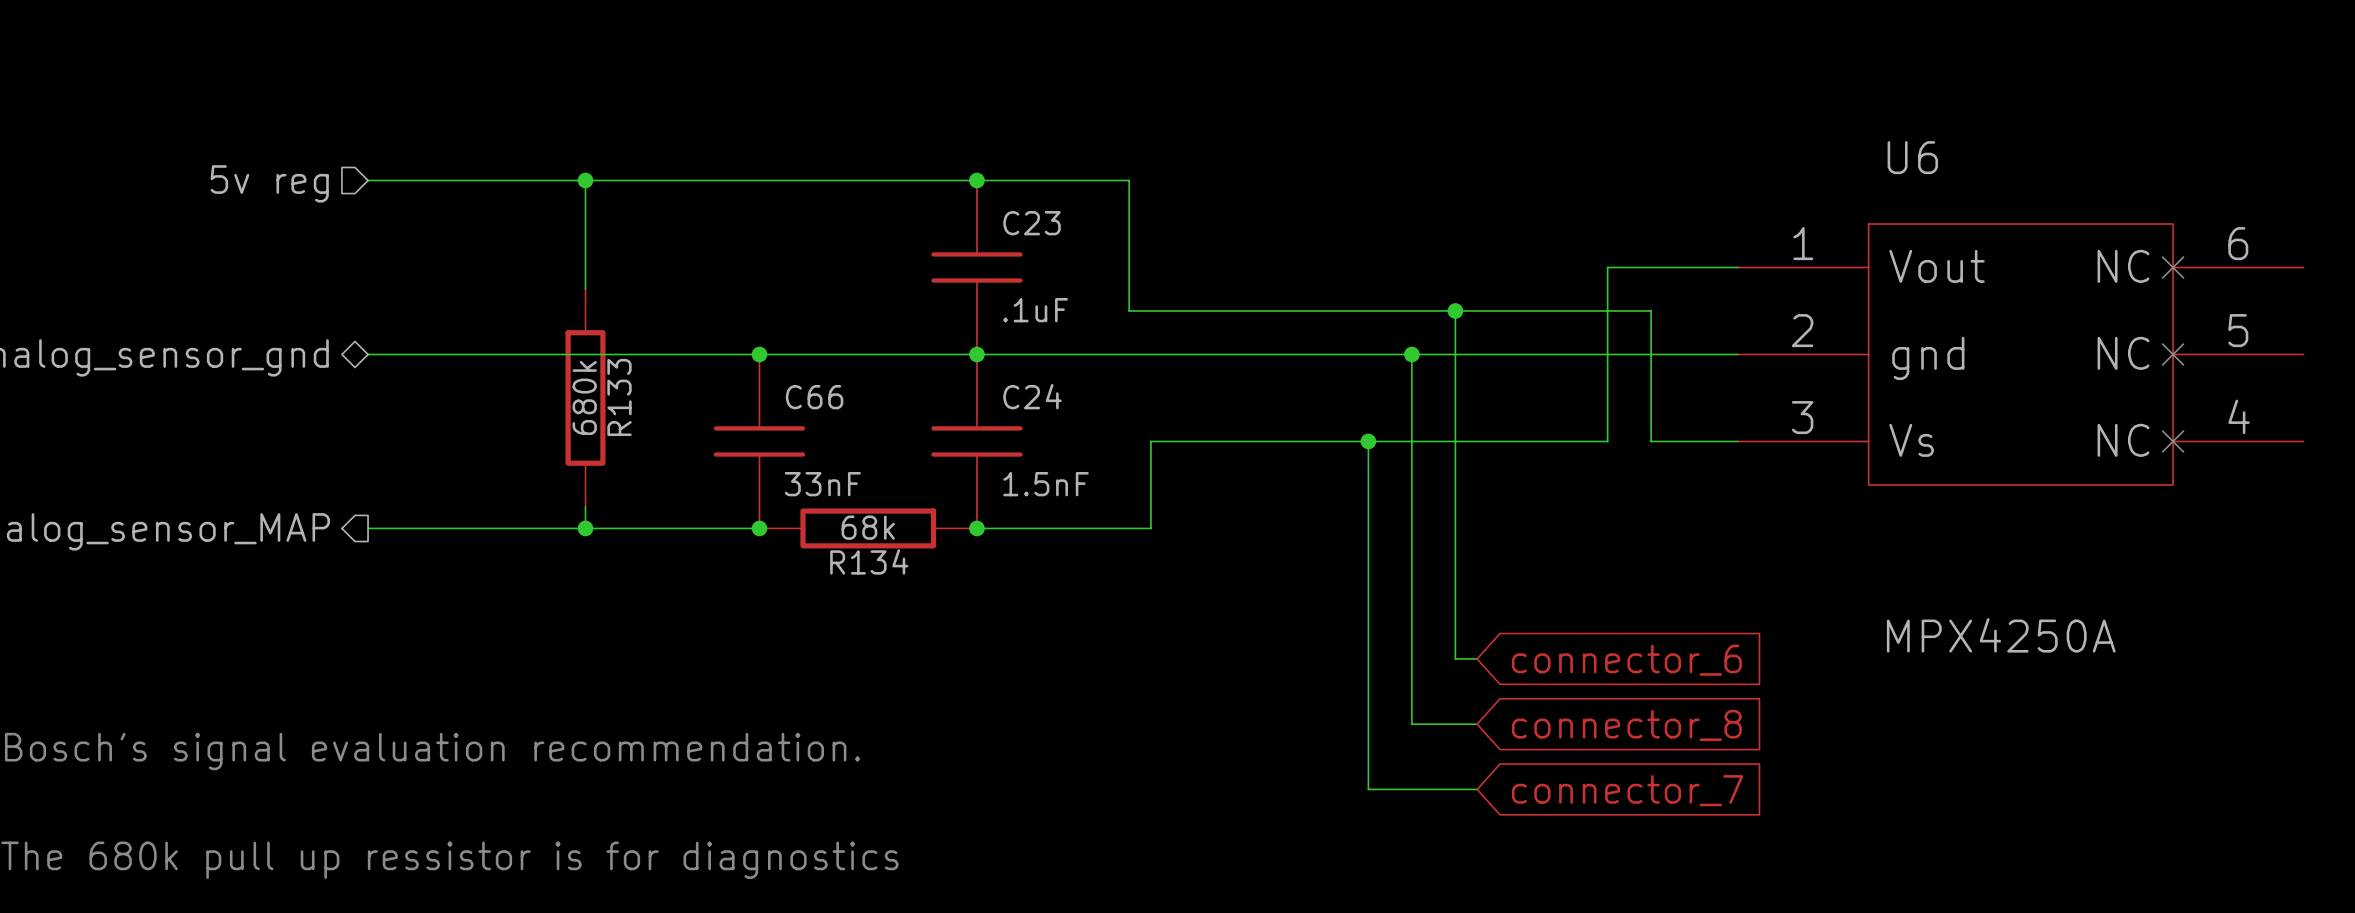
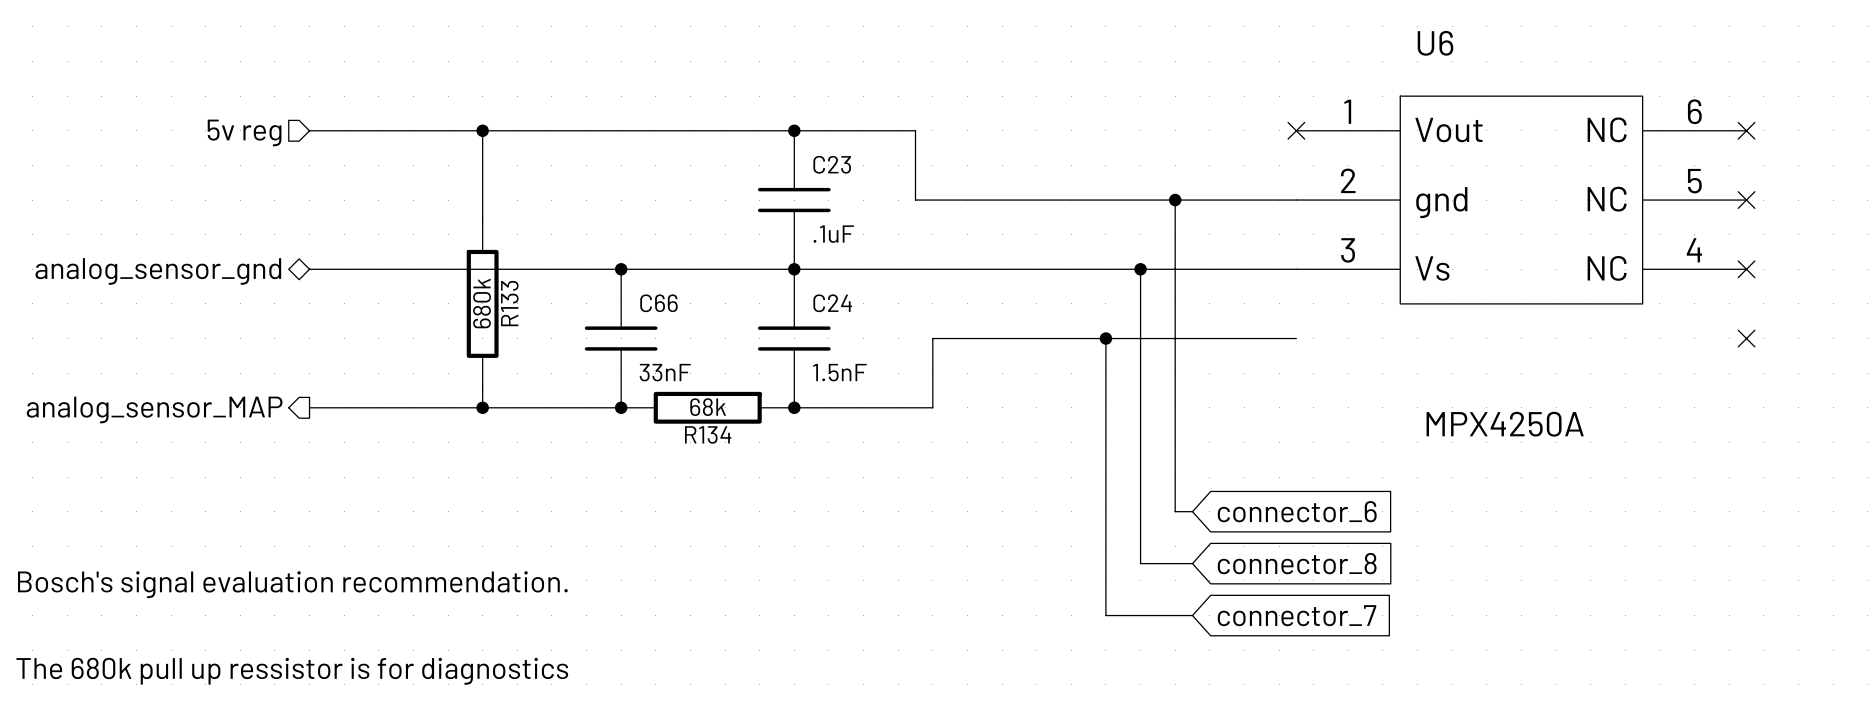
no-connect mark: none -> (1296, 130)
no-connect mark: none -> (1746, 130)
wire: (1129, 267) (1129, 310) (1651, 310) (1651, 441) (1738, 441) -> (915, 200) (1296, 200)
wire: none -> (1175, 200) (1175, 234)
wire: (1738, 267) (1607, 267) (1607, 441) -> none
junction position: (1455, 310) -> (1175, 200)
U6 position: (2020, 354) -> (1521, 200)

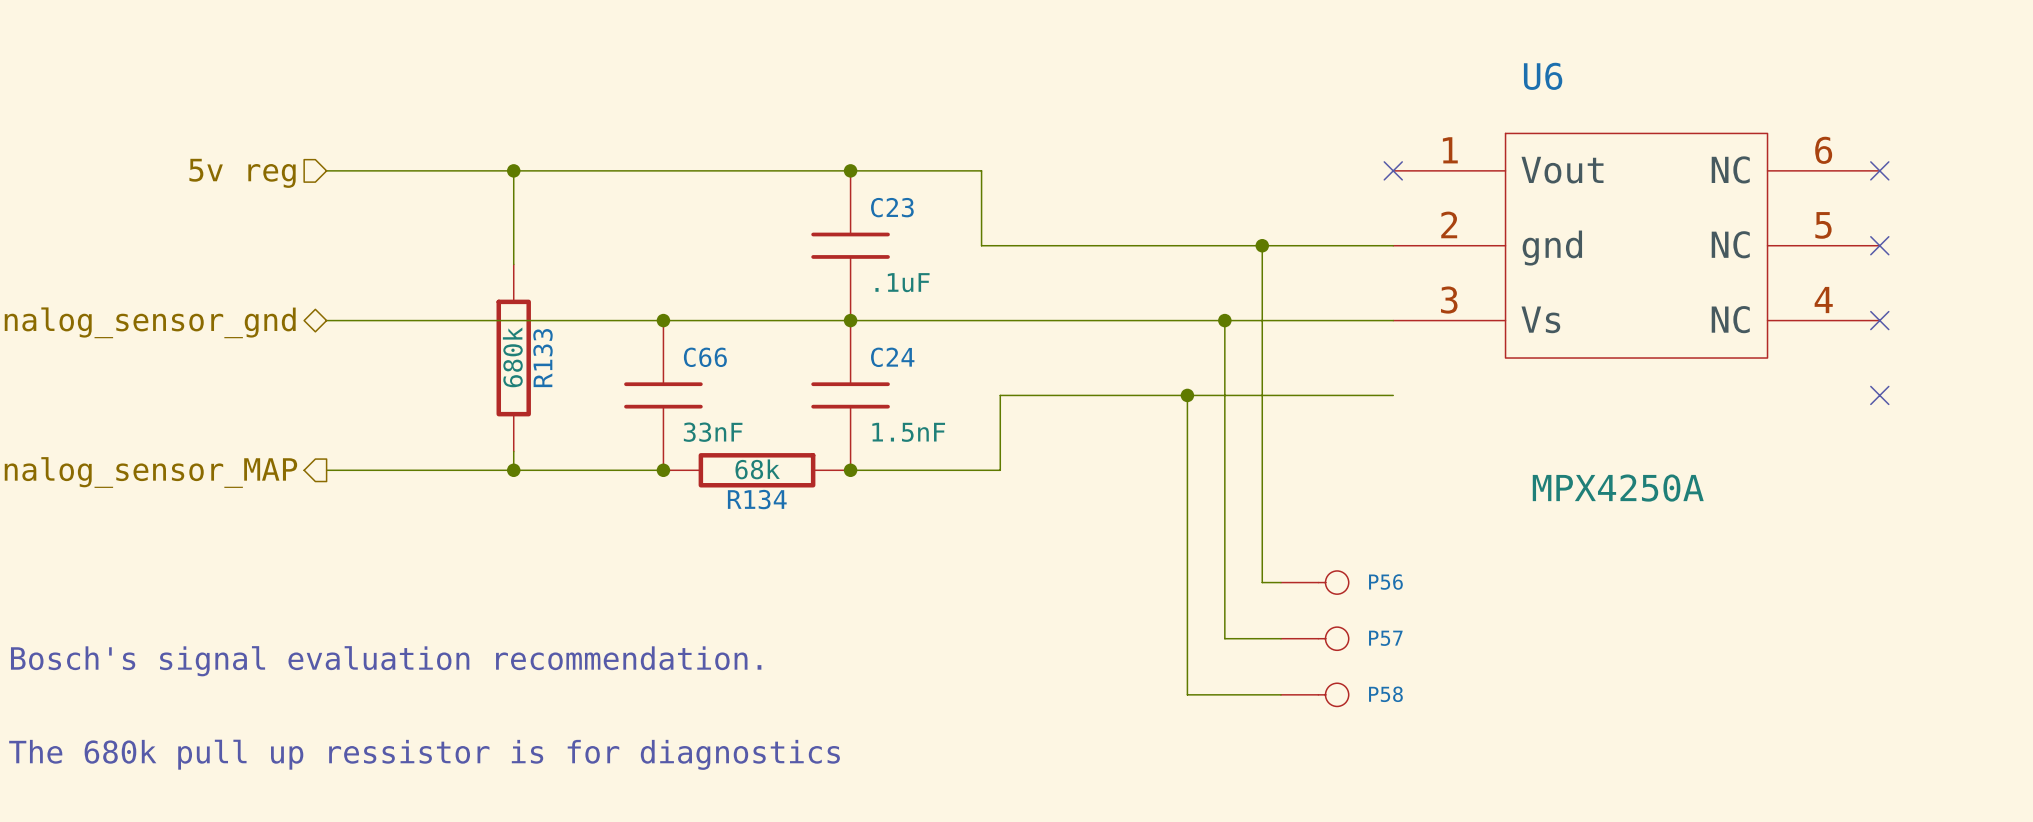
P56: none -> (1314, 582)
global label: connector_6 (1297, 511) -> none
P57: none -> (1314, 638)
global label: connector_8 (1297, 563) -> none
P58: none -> (1314, 694)
global label: connector_7 (1297, 615) -> none

